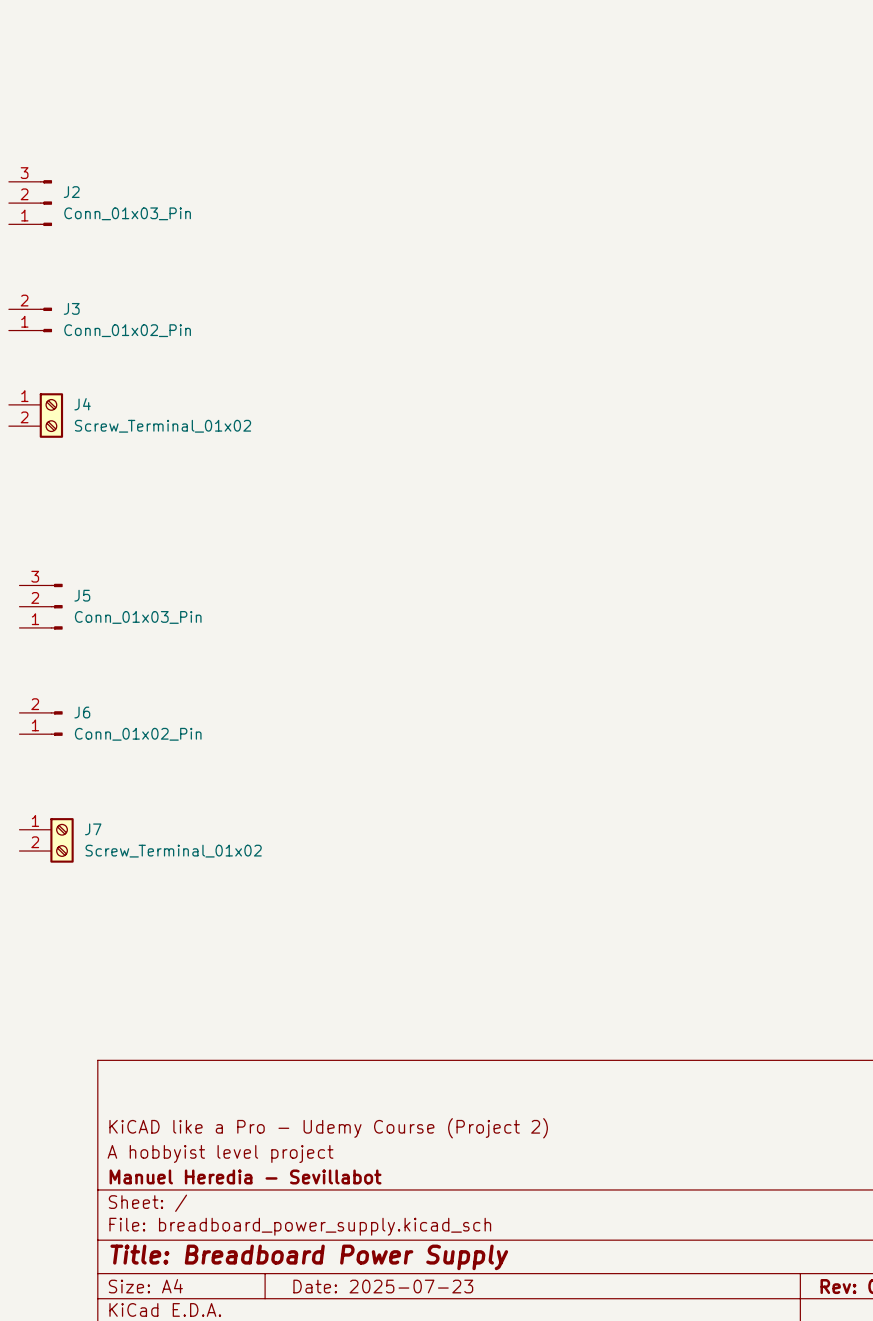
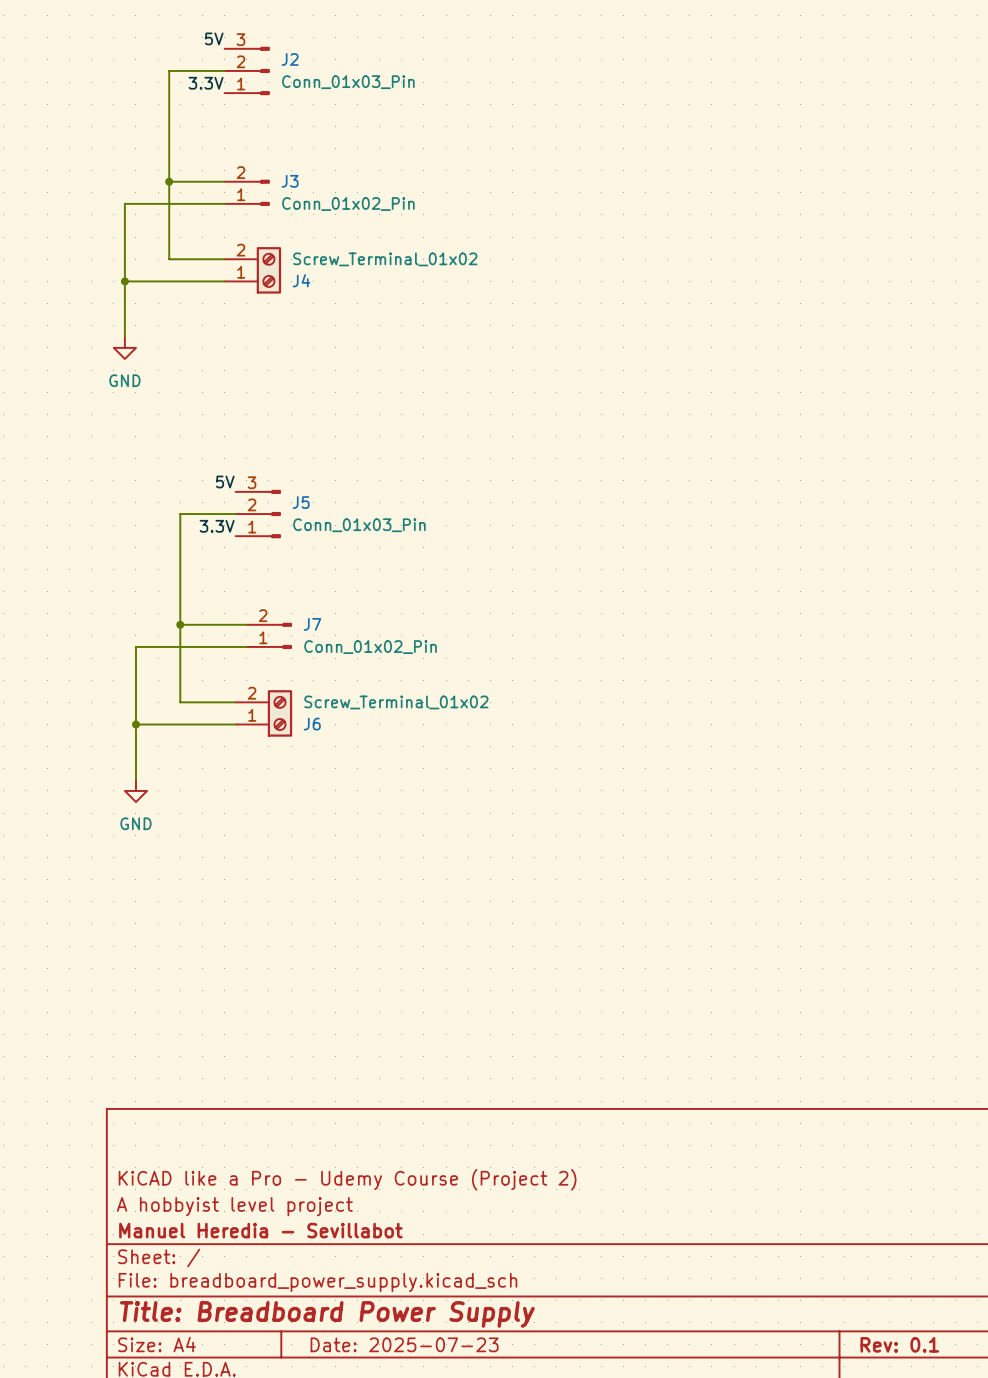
label: none -> 5V (214, 38)
wire: none -> (224, 70) (169, 70) (169, 259) (224, 259)
label: none -> 3.3V (206, 83)
wire: none -> (169, 181) (224, 181)
junction: none -> (169, 181)
wire: none -> (224, 203) (124, 203) (124, 336)
J2 position: (30, 203) -> (247, 70)
wire: none -> (124, 281) (224, 281)
junction: none -> (124, 281)
J3 position: (30, 319) -> (247, 192)
power symbol: none -> GND (124, 347)
J4 position: (36, 415) -> (252, 270)
J4 flip: as is (51, 415) -> up-down (268, 270)
label: none -> 5V (225, 482)
wire: none -> (235, 514) (180, 514) (180, 702) (235, 702)
label: none -> 3.3V (217, 526)
wire: none -> (180, 624) (246, 624)
junction: none -> (180, 624)
J5 position: (41, 606) -> (258, 514)
wire: none -> (246, 646) (135, 646) (135, 779)
wire: none -> (135, 724) (235, 724)
junction: none -> (135, 724)
J6 symbol: [19, 711, 63, 736] -> [235, 690, 293, 737]
J6 name position: J6 (82, 712) -> J6 (312, 724)
J6 value: Conn_01x02_Pin (138, 734) -> Screw_Terminal_01x02 (396, 702)
power symbol: none -> GND (135, 790)
J7 symbol: [19, 818, 74, 863] -> [246, 623, 292, 649]
J7 value: Screw_Terminal_01x02 (173, 851) -> Conn_01x02_Pin (370, 647)

